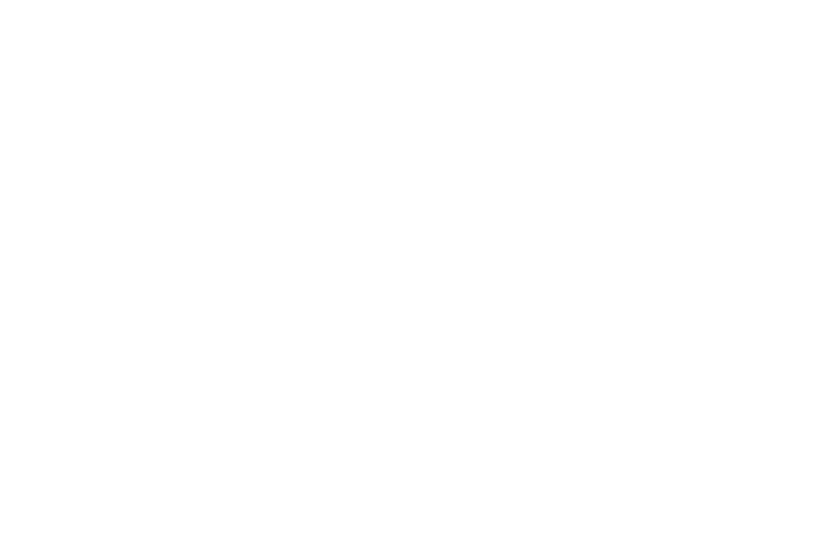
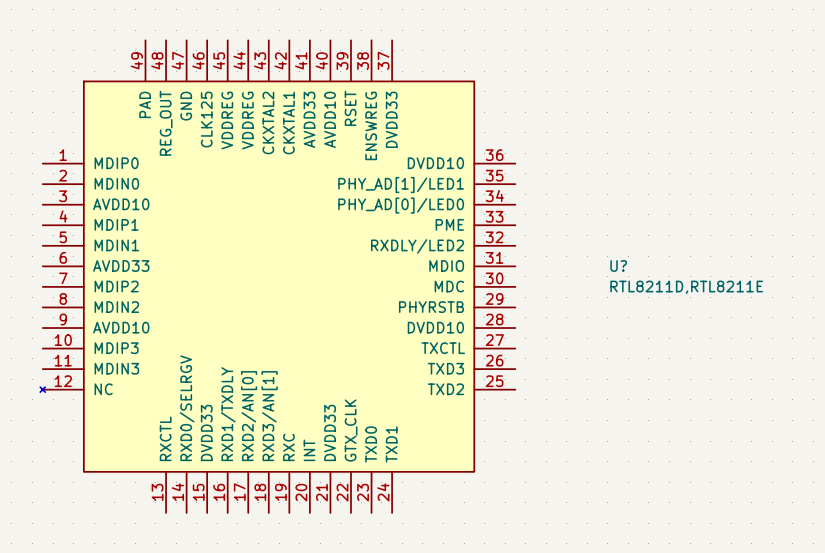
U?: none -> RTL8211D,RTL8211E (277, 276)

